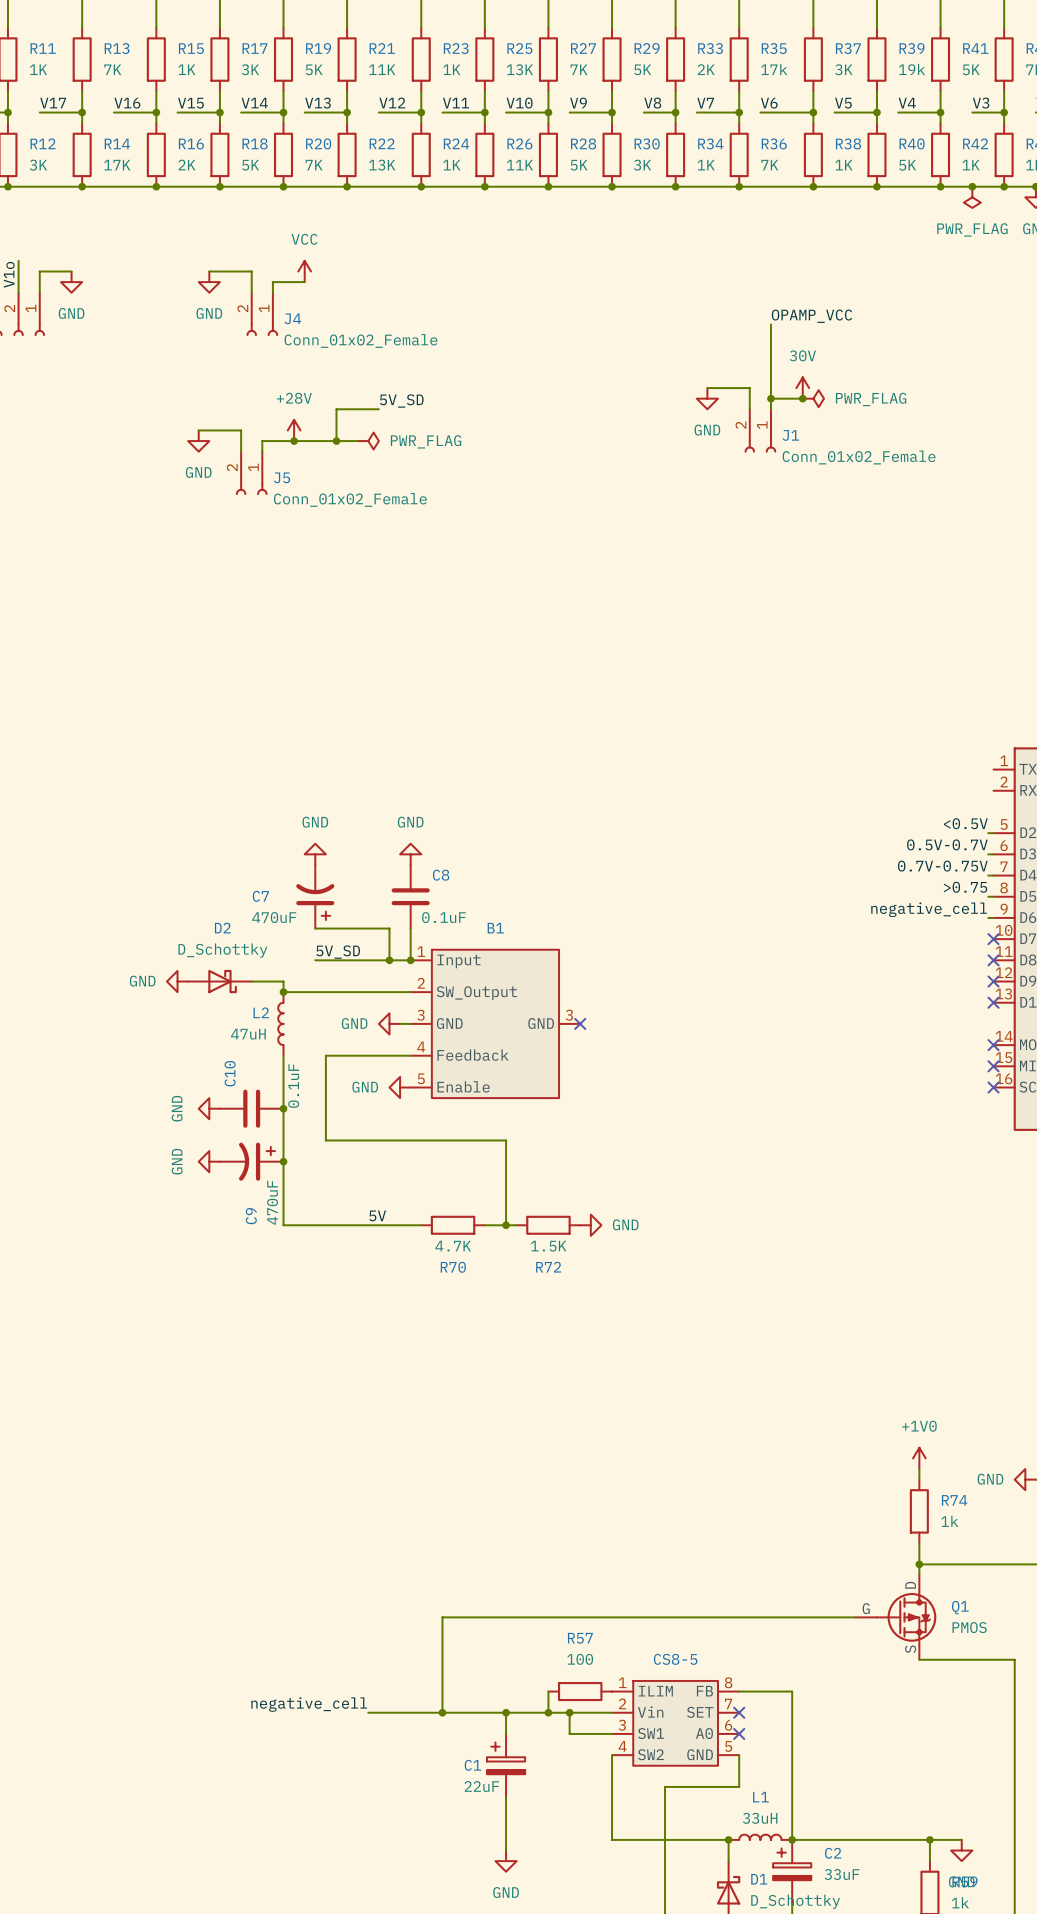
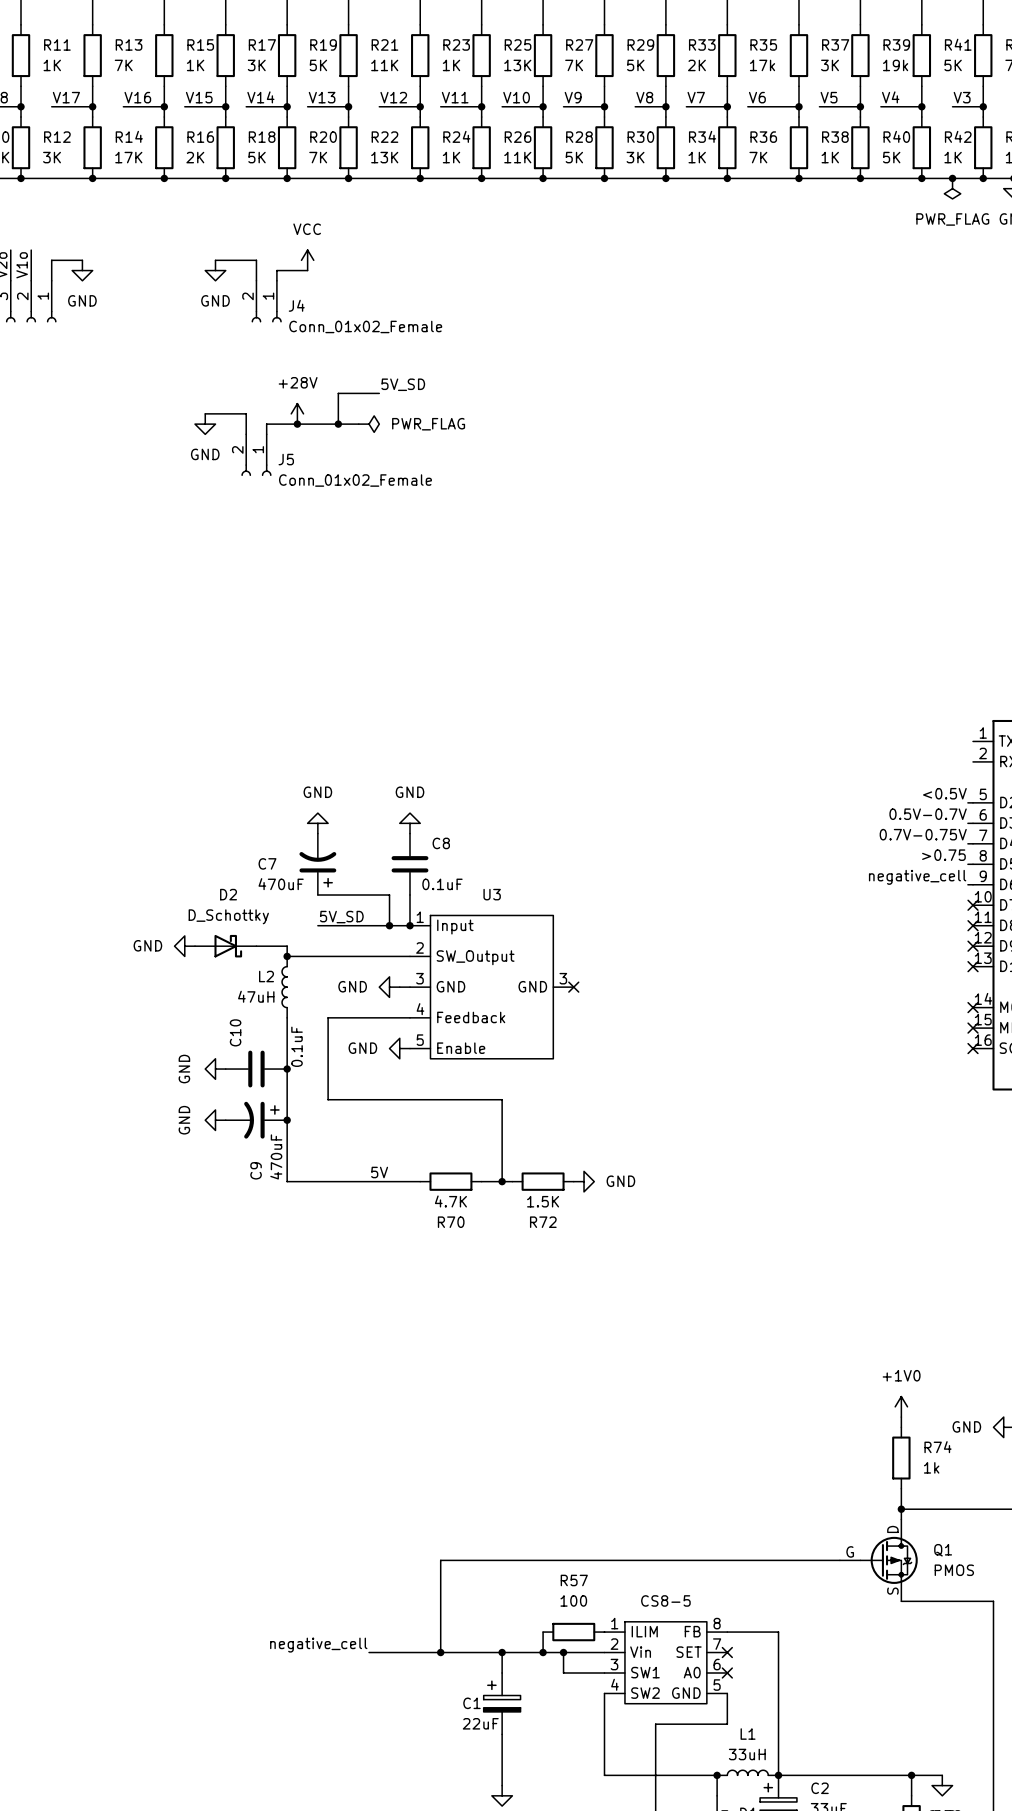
label: OPAMP_VCC (811, 316) -> none
wire: (770, 324) (770, 409) -> none
wire: (707, 388) (749, 388) (749, 409) -> none
power symbol: 30V (802, 388) -> none
power symbol: GND (707, 398) -> none
wire: (770, 398) (802, 398) -> none
junction: (770, 398) -> none
junction: (802, 398) -> none
power symbol: PWR_FLAG (813, 398) -> none
J1: Conn_01x02_Female (760, 430) -> none
B1 name: B1 (495, 928) -> U3 (492, 894)

